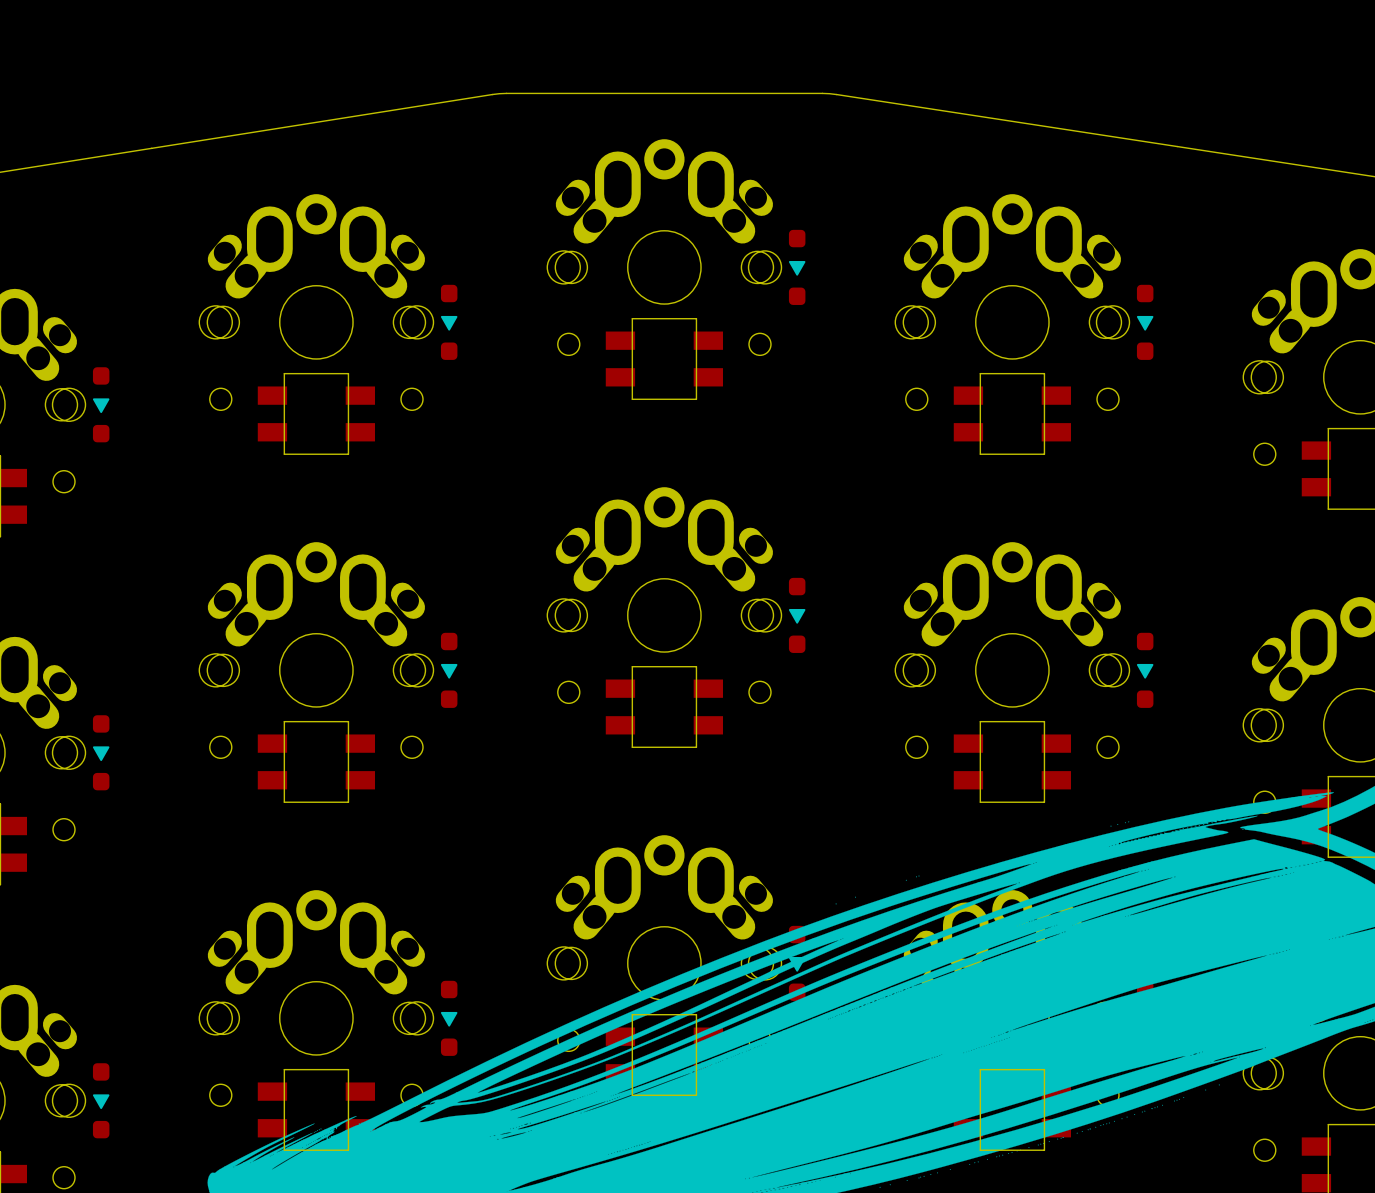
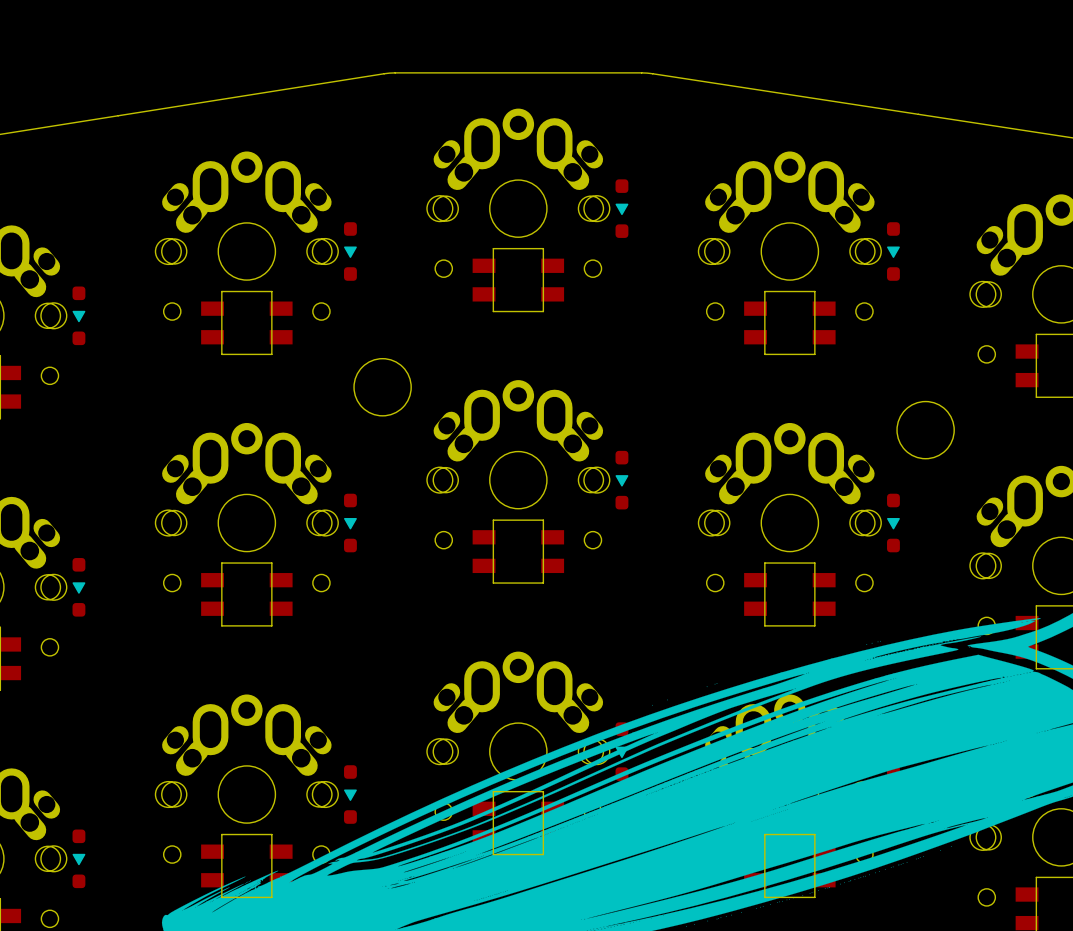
round board edge: none -> [353, 358, 412, 417]
round board edge: none -> [896, 401, 955, 460]

